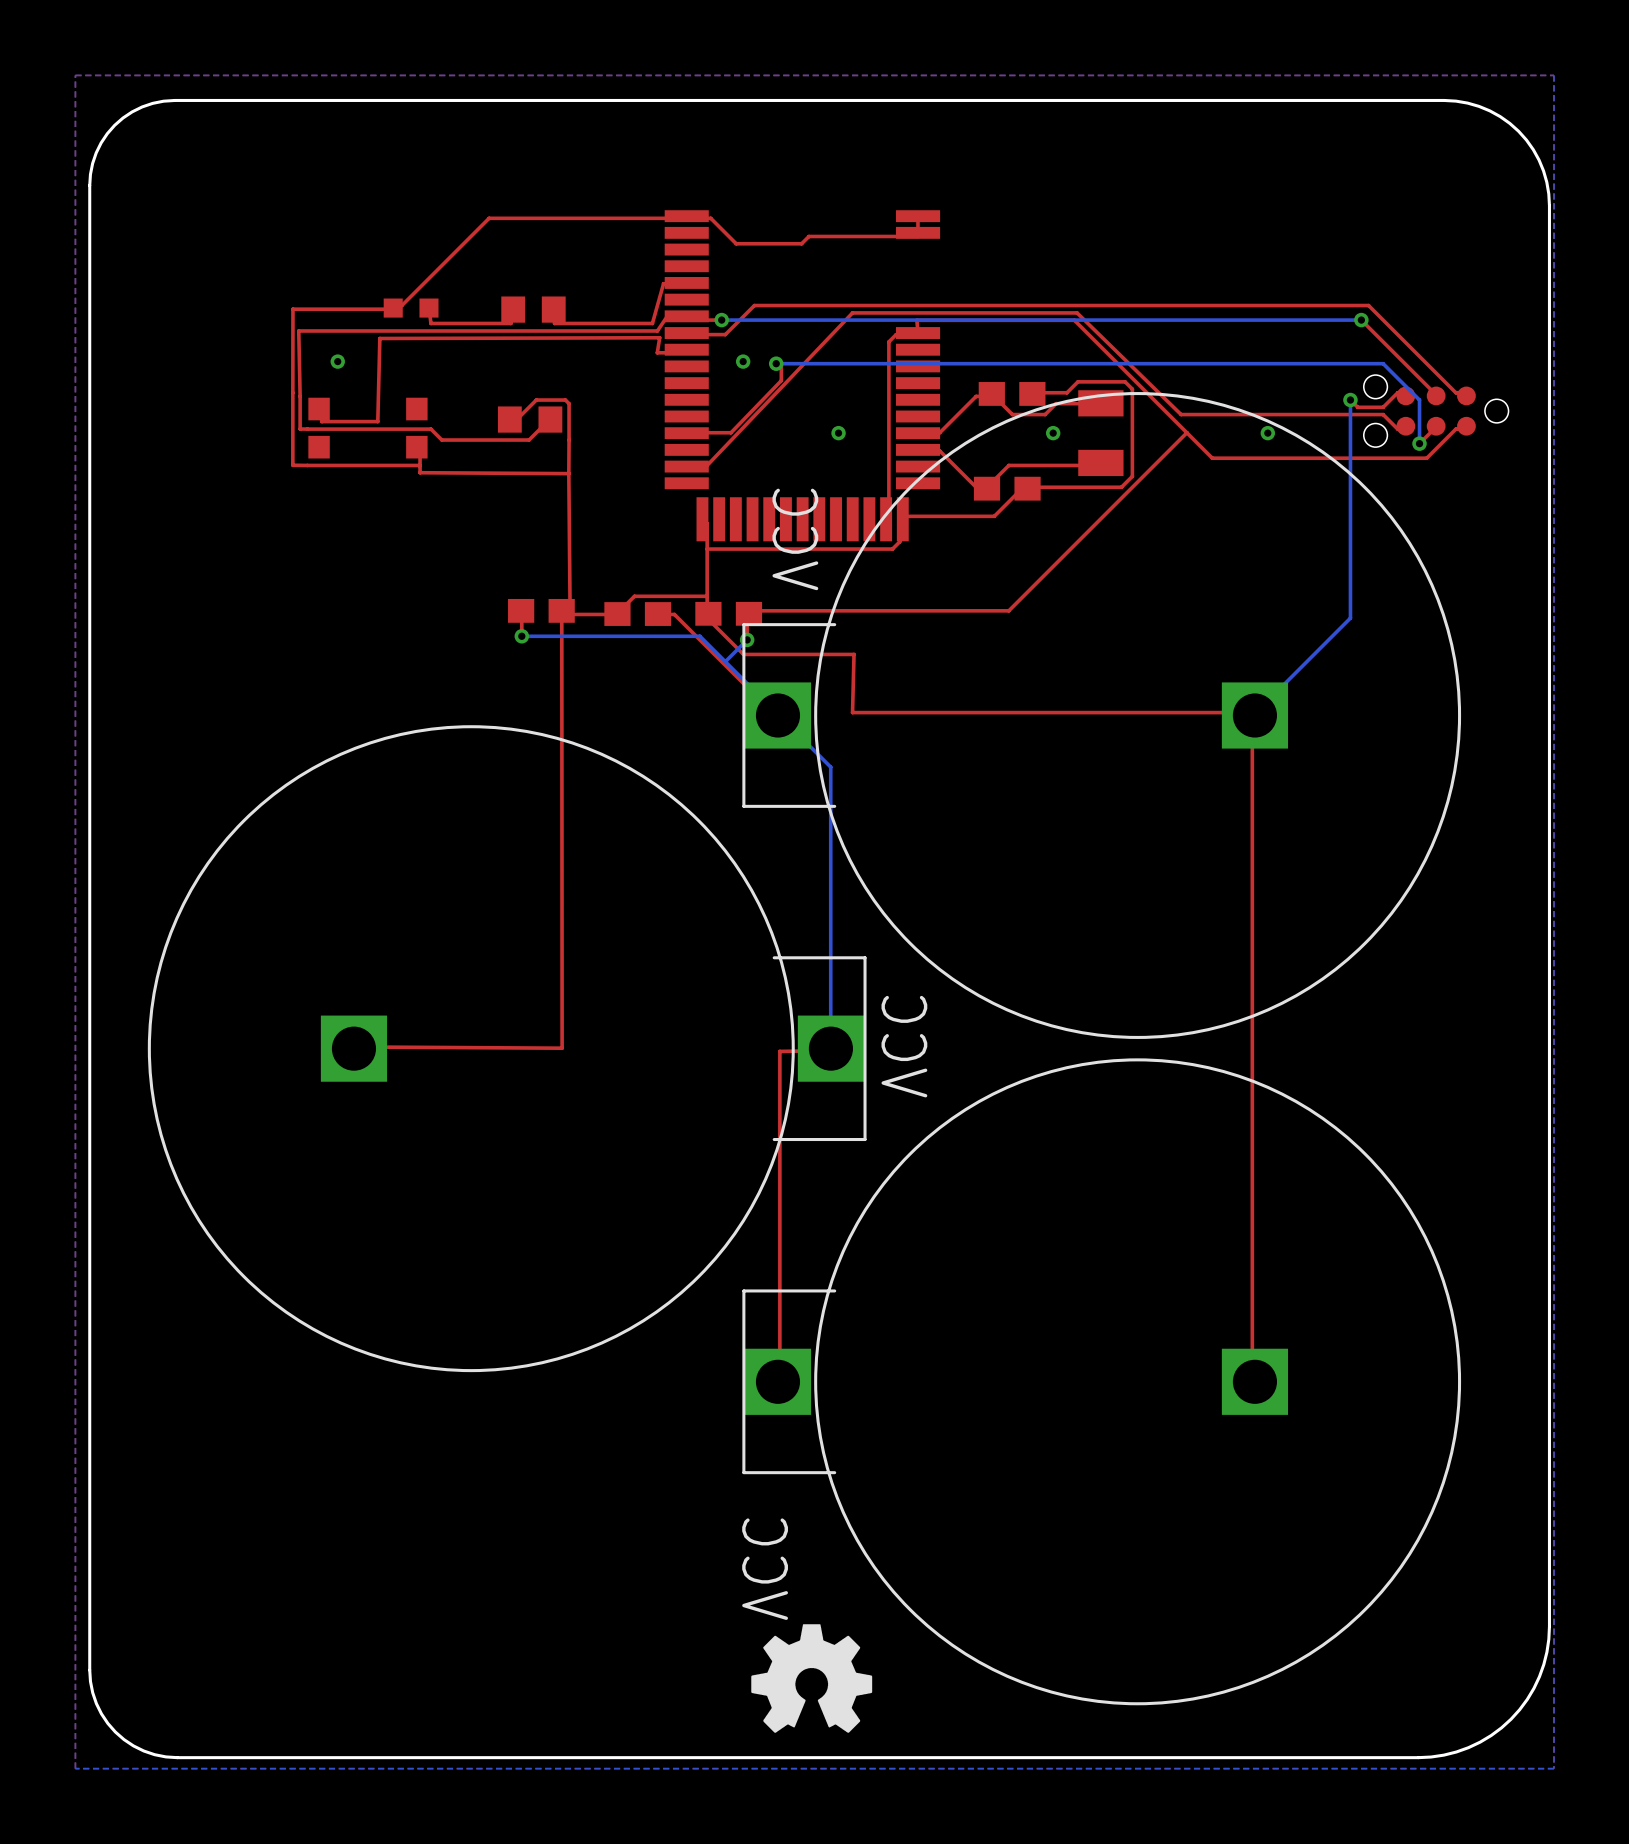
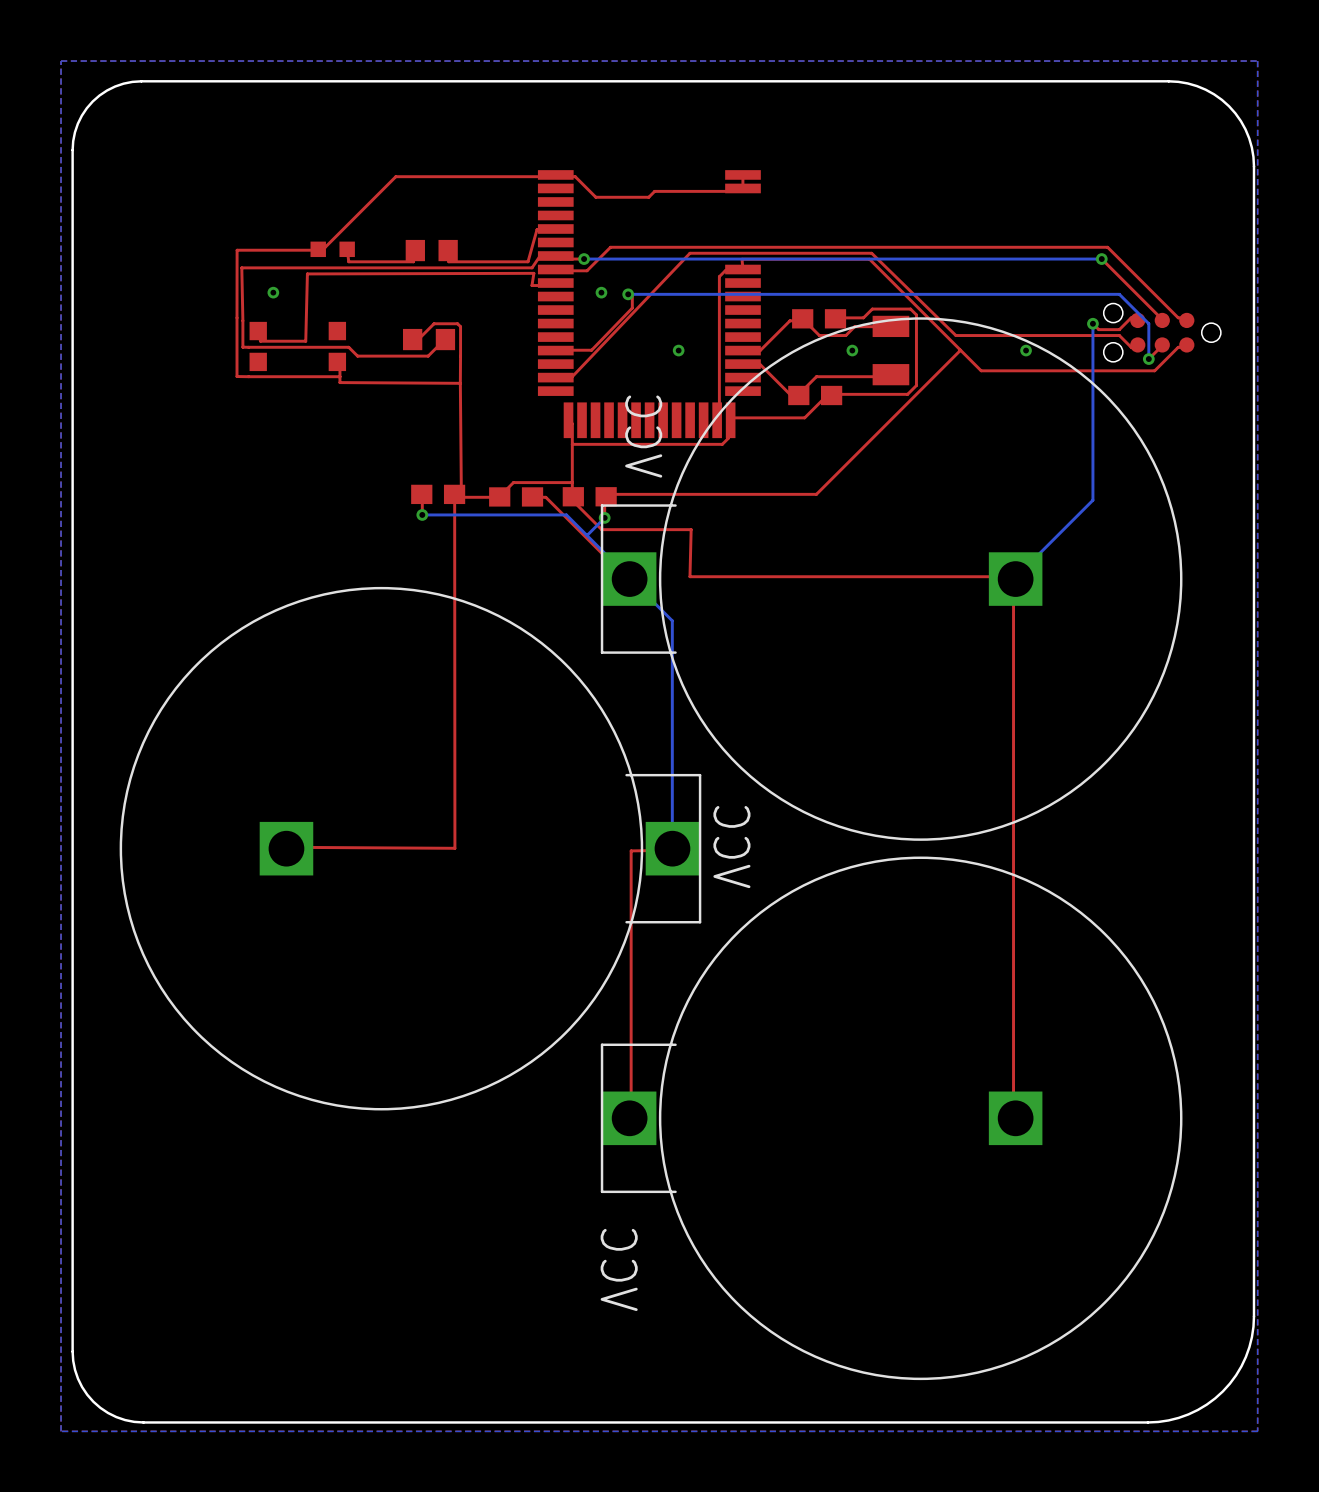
drawing: [751, 1624, 873, 1733] -> none

